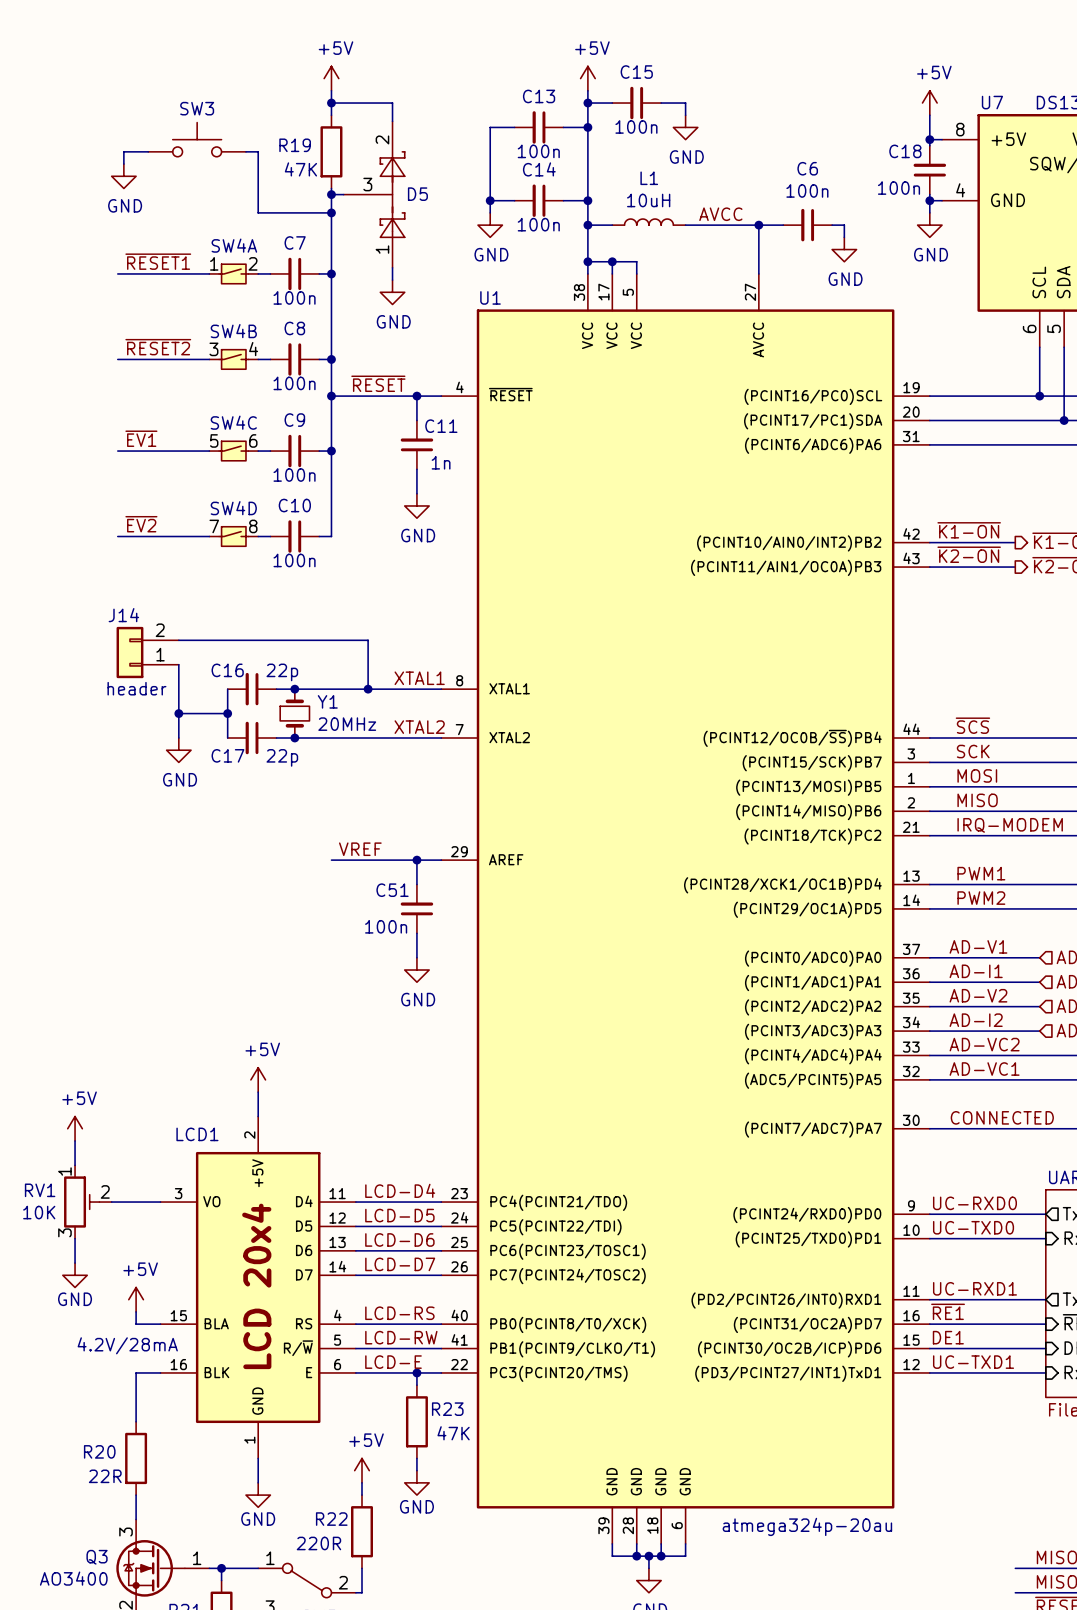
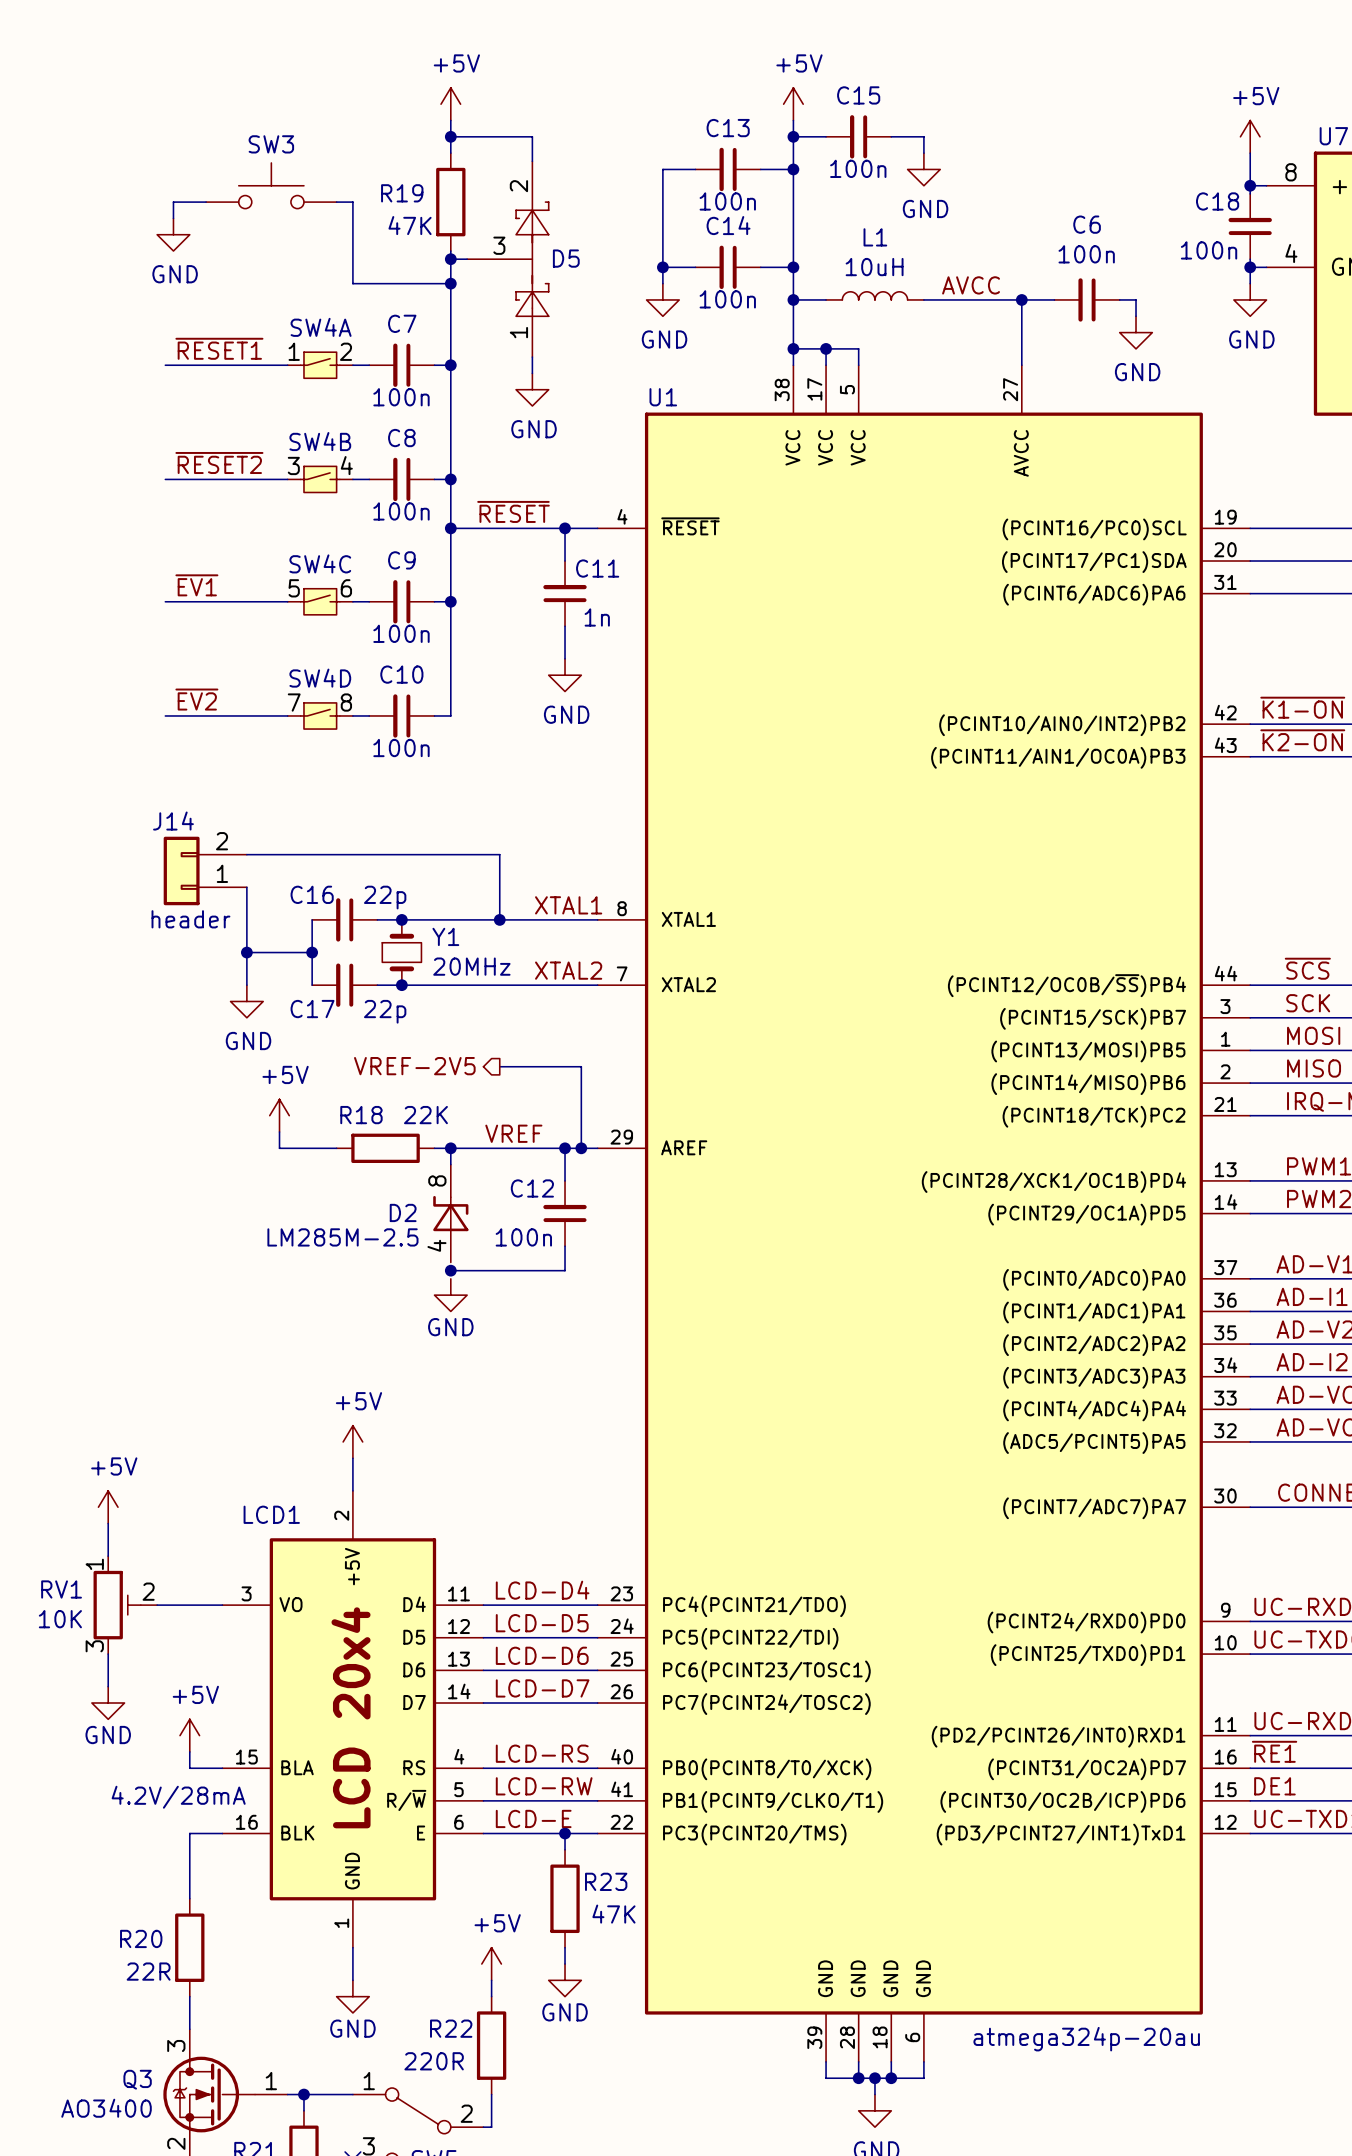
hierarchical label: none -> VREF-2V5 (414, 1066)
wire: none -> (499, 1066) (581, 1066) (581, 1148)
power symbol: none -> +5V (279, 1115)
wire: none -> (279, 1132) (279, 1148) (336, 1148)
label position: VREF (360, 849) -> VREF (513, 1133)
R18: none -> 22K (385, 1148)
wire: none -> (434, 1148) (450, 1148) (450, 1164)
junction: none -> (450, 1148)
junction: none -> (581, 1148)
C51 name: C51 (392, 890) -> C12 (532, 1188)
D2: none -> LM285M-2.5 (450, 1213)
junction: none -> (450, 1270)
wire: (416, 951) (416, 957) -> (565, 1270) (450, 1270)
power symbol position: GND (416, 970) -> GND (450, 1295)
power symbol text position: GND (418, 999) -> GND (450, 1327)

